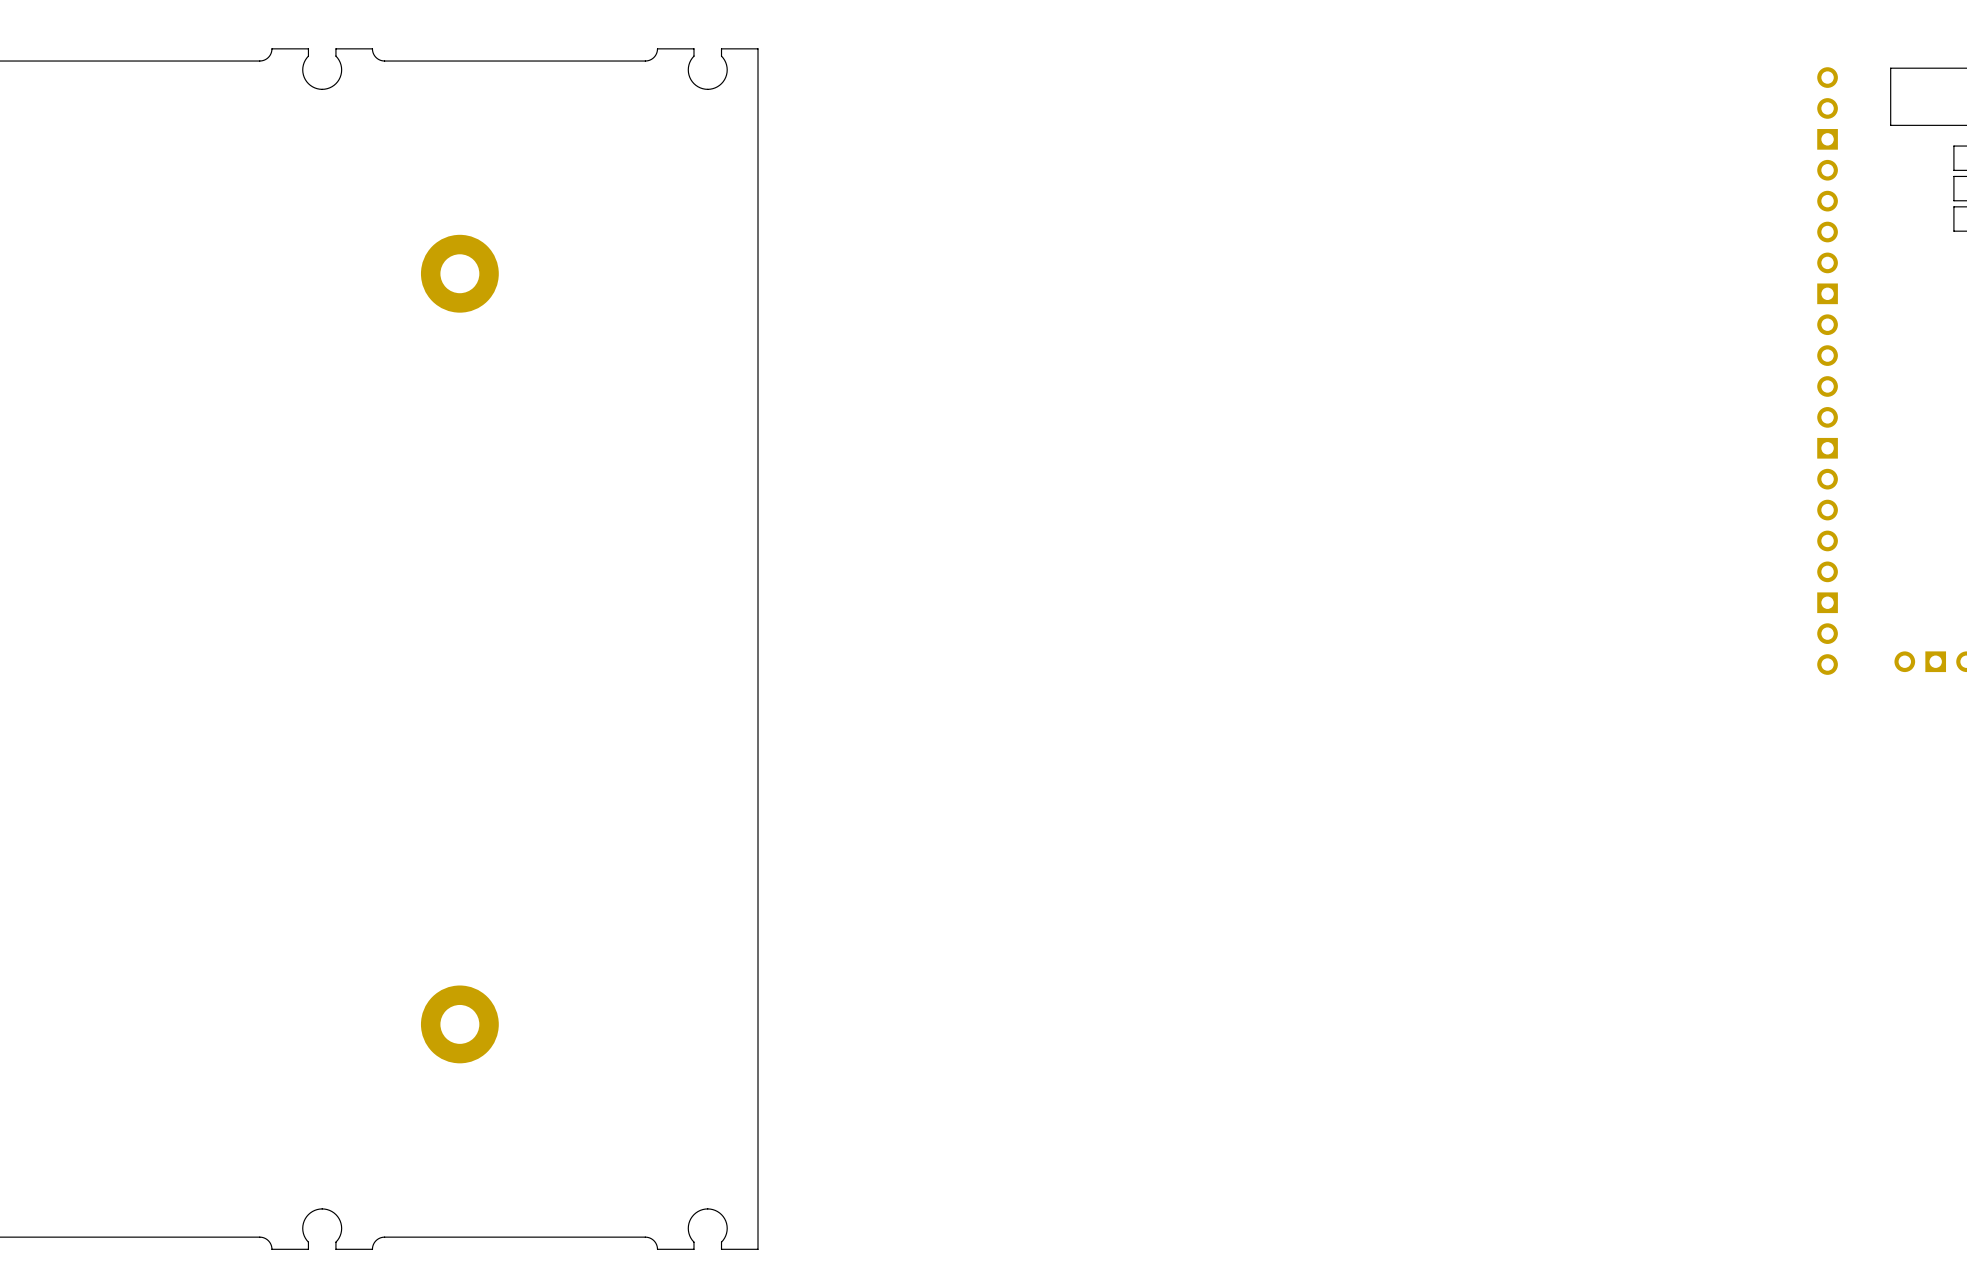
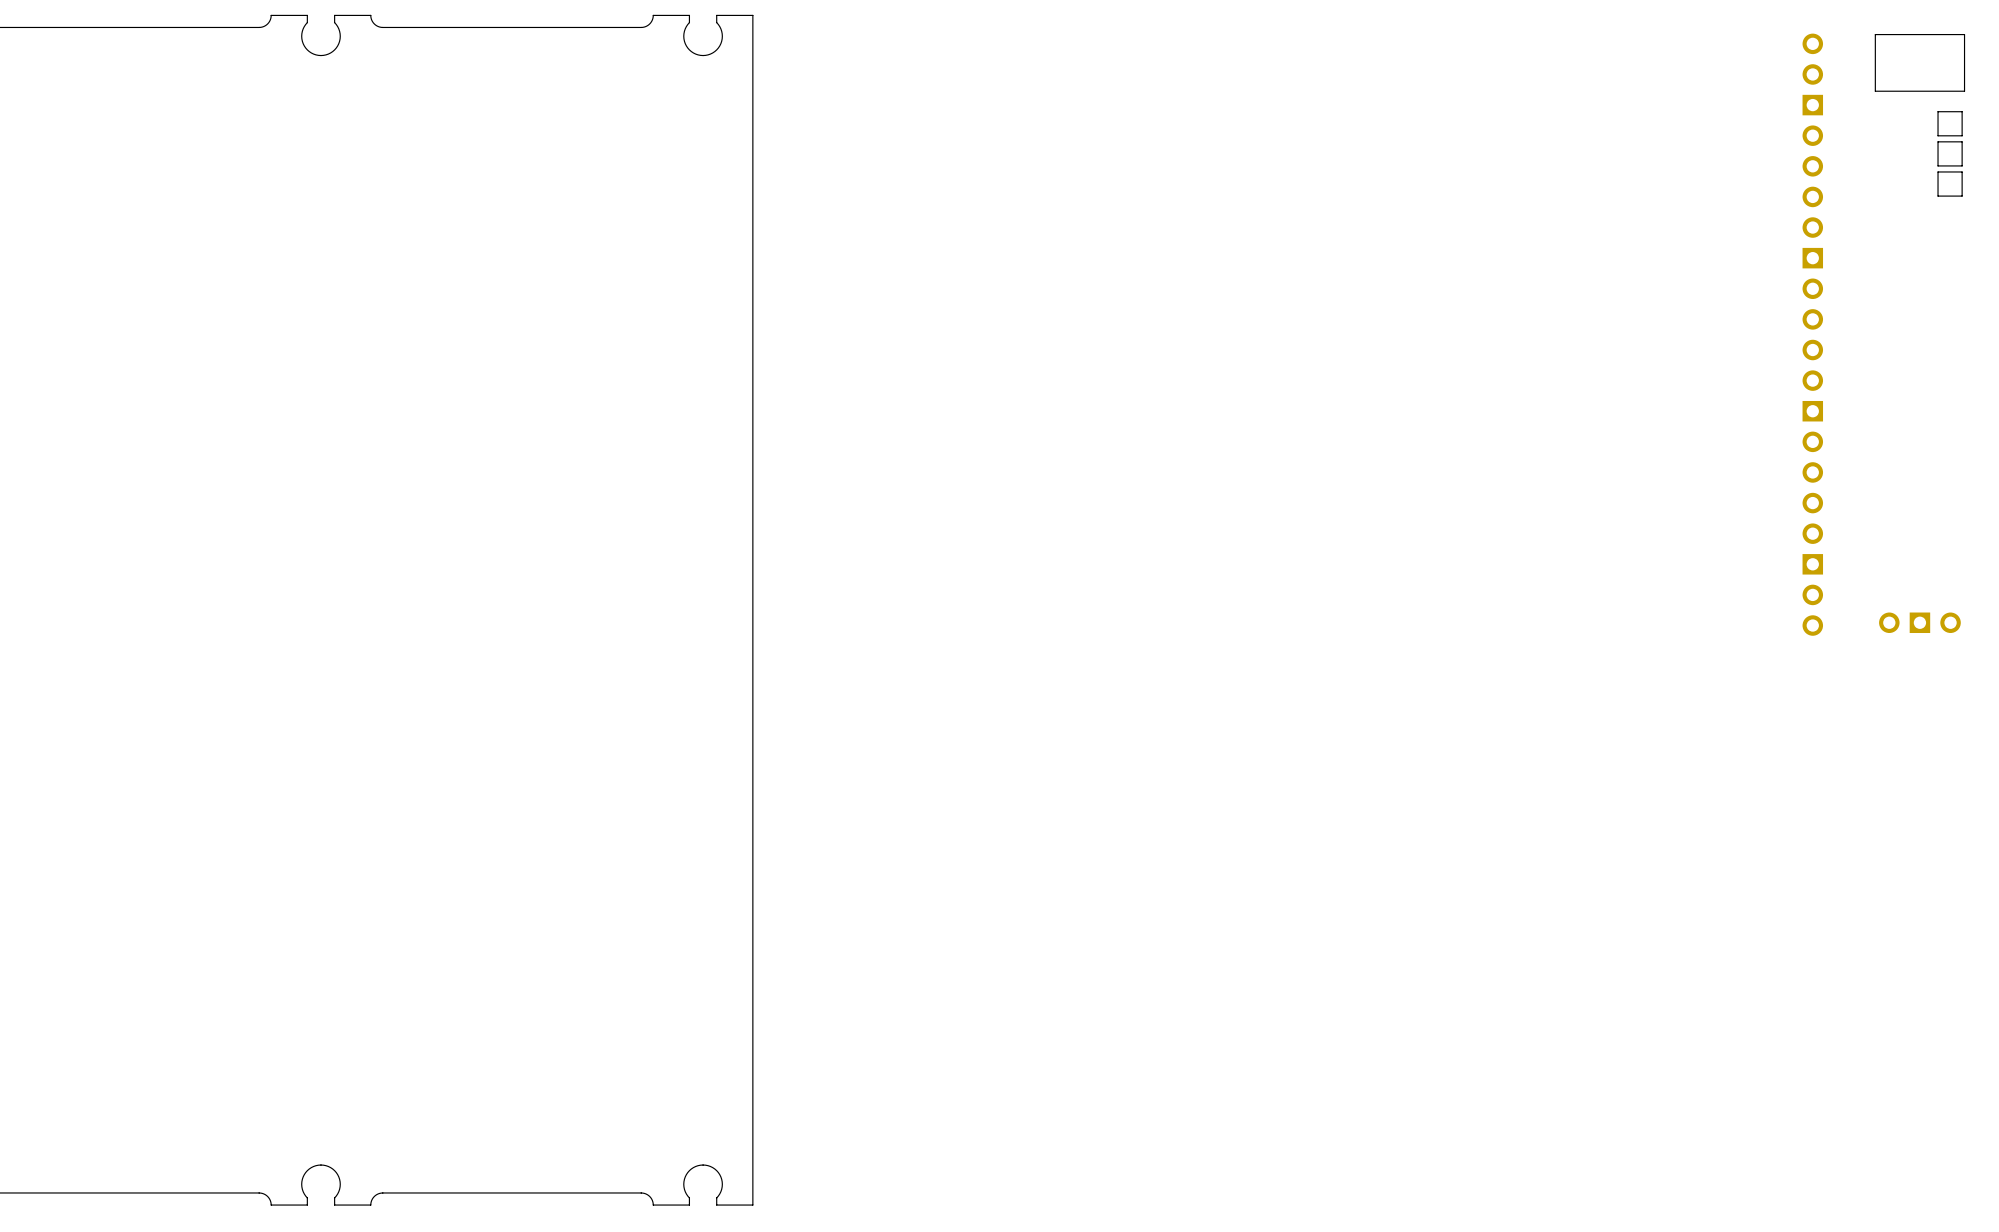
part: (459, 273) -> none
part: (459, 1024) -> none

